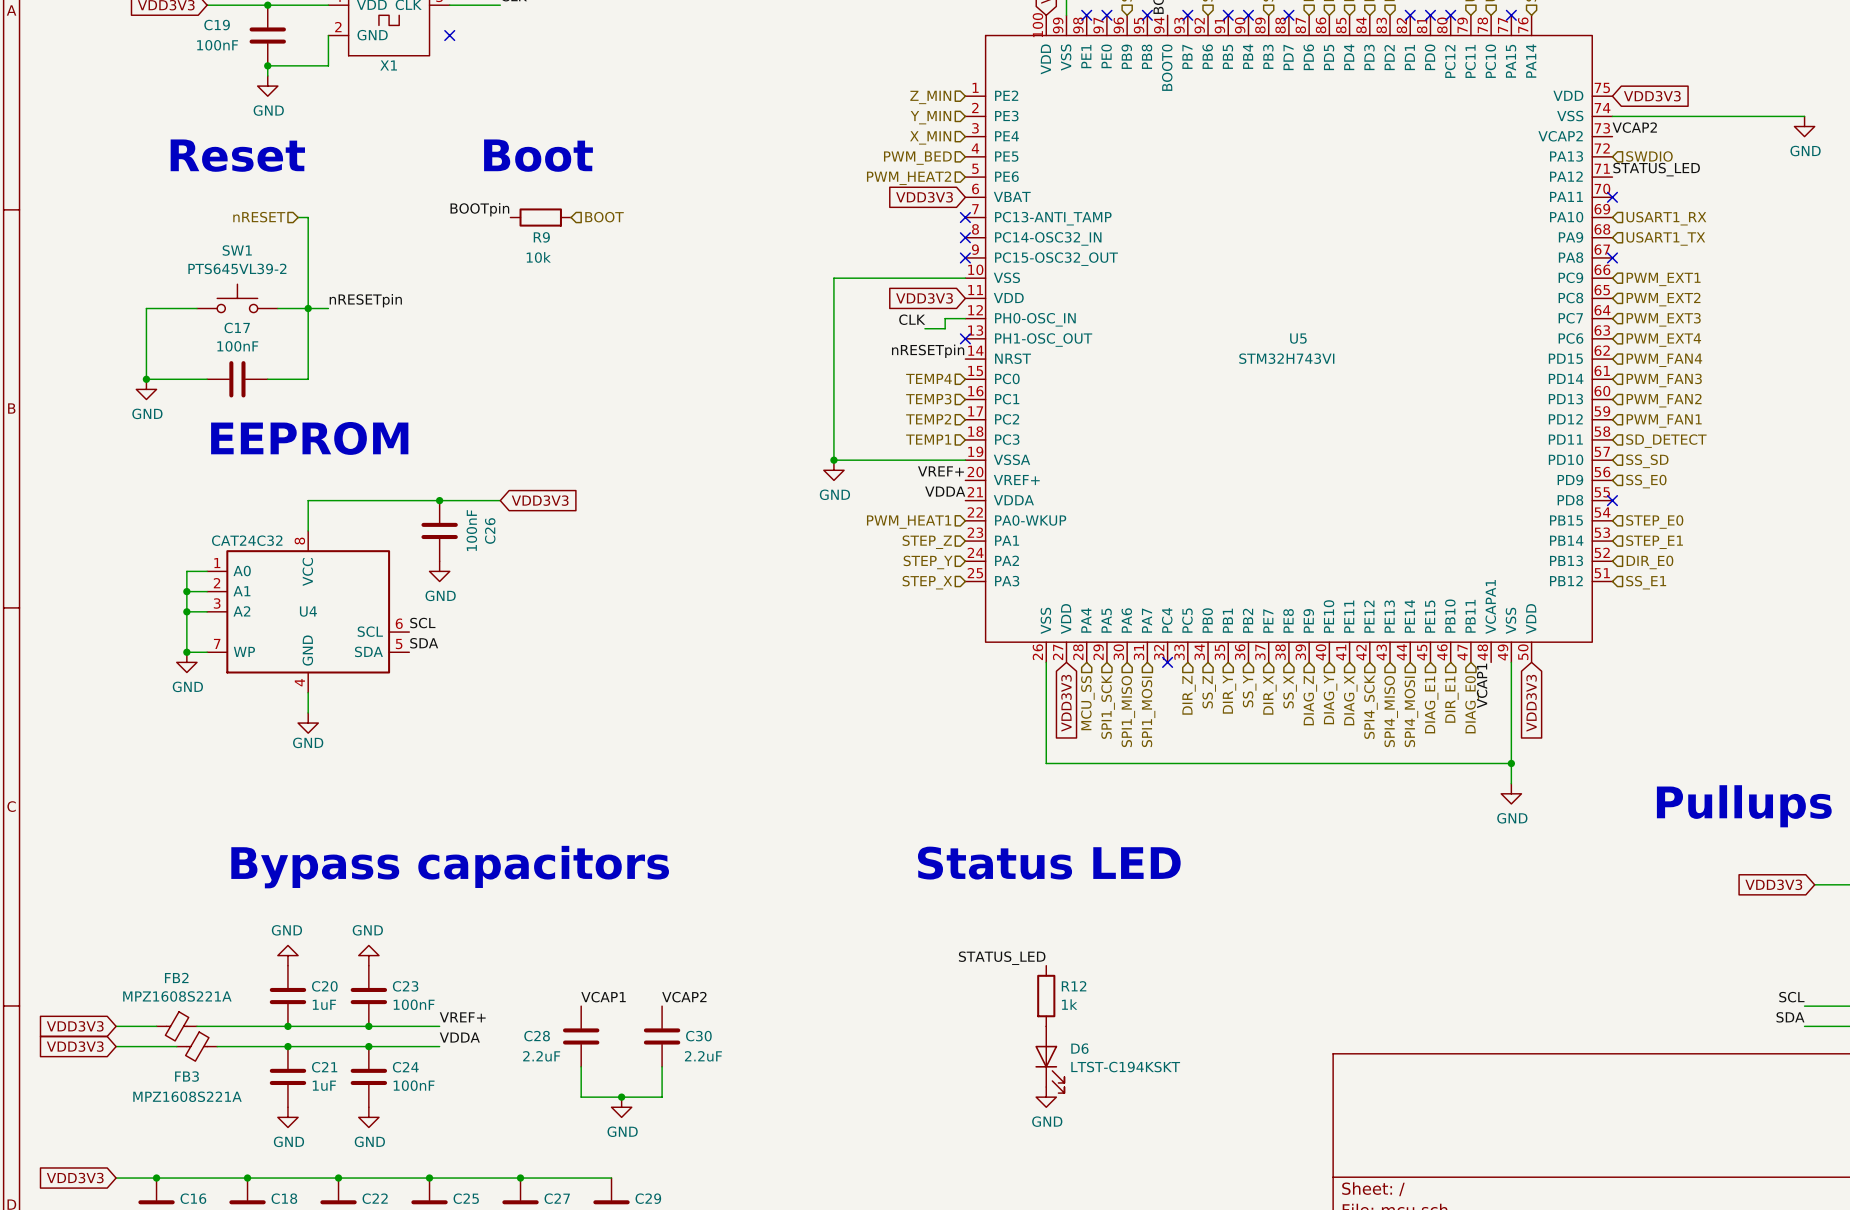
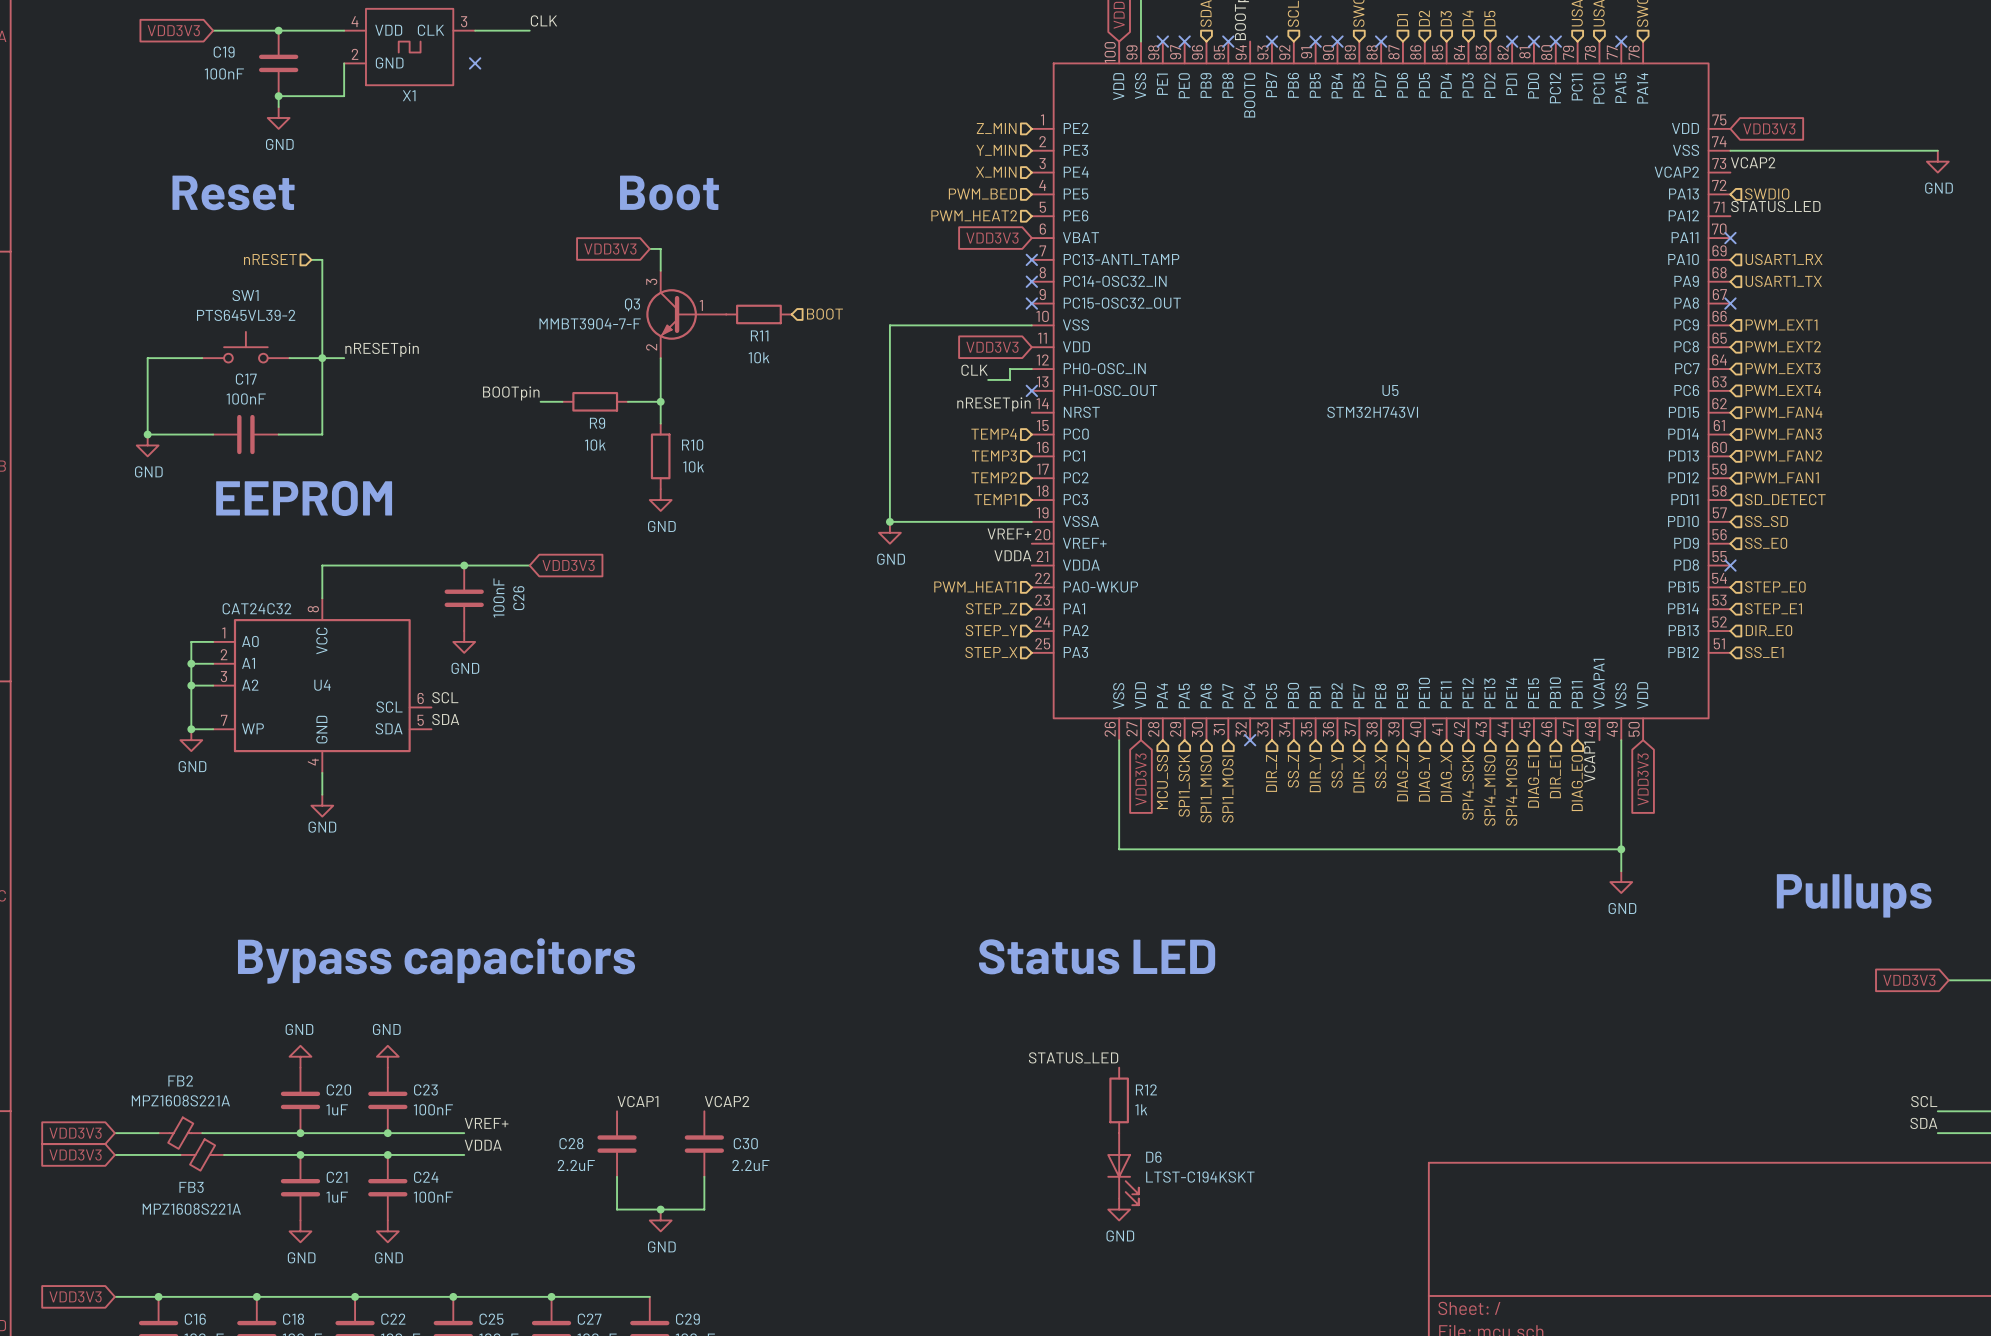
text position: Boot (538, 155) -> Boot (669, 192)
global label: none -> VDD3V3 (610, 249)
wire: none -> (649, 248) (660, 248) (660, 270)
label position: BOOTpin (479, 209) -> BOOTpin (511, 393)
R9 position: (540, 217) -> (595, 401)
hierarchical label position: BOOT (604, 217) -> BOOT (824, 314)
Q3: none -> MMBT3904-7-F (686, 314)
R11: none -> 10k (758, 314)
wire: none -> (660, 358) (660, 423)
wire: none -> (540, 401) (562, 401)
wire: none -> (627, 401) (660, 401)
junction: none -> (660, 401)
R10: none -> 10k (660, 456)
power symbol: none -> GND (660, 500)

